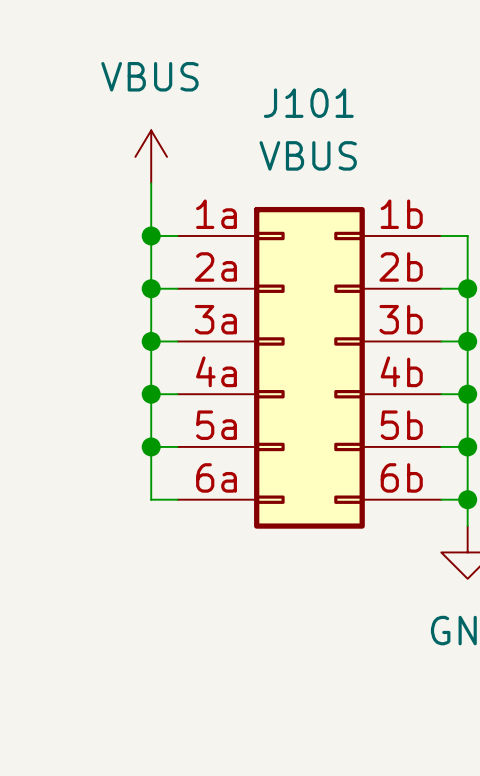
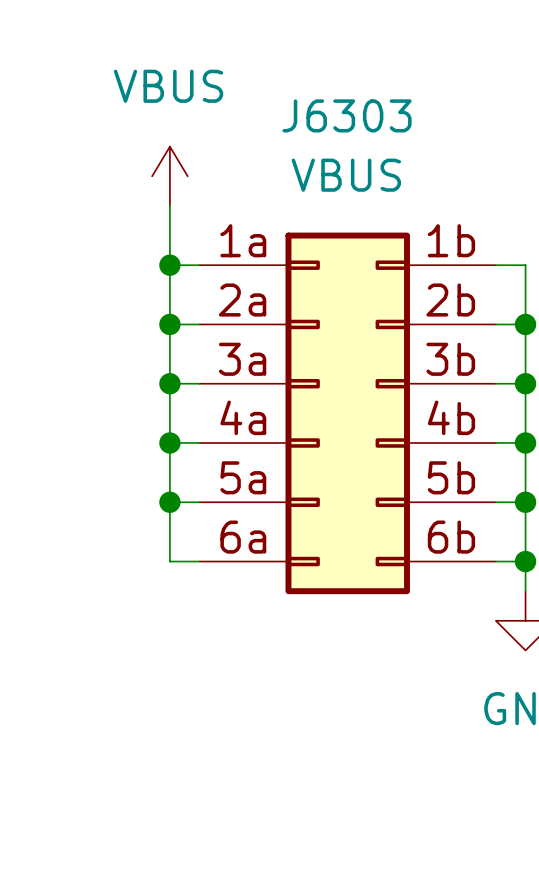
J101 name: J101 (308, 103) -> J6303 (347, 115)

